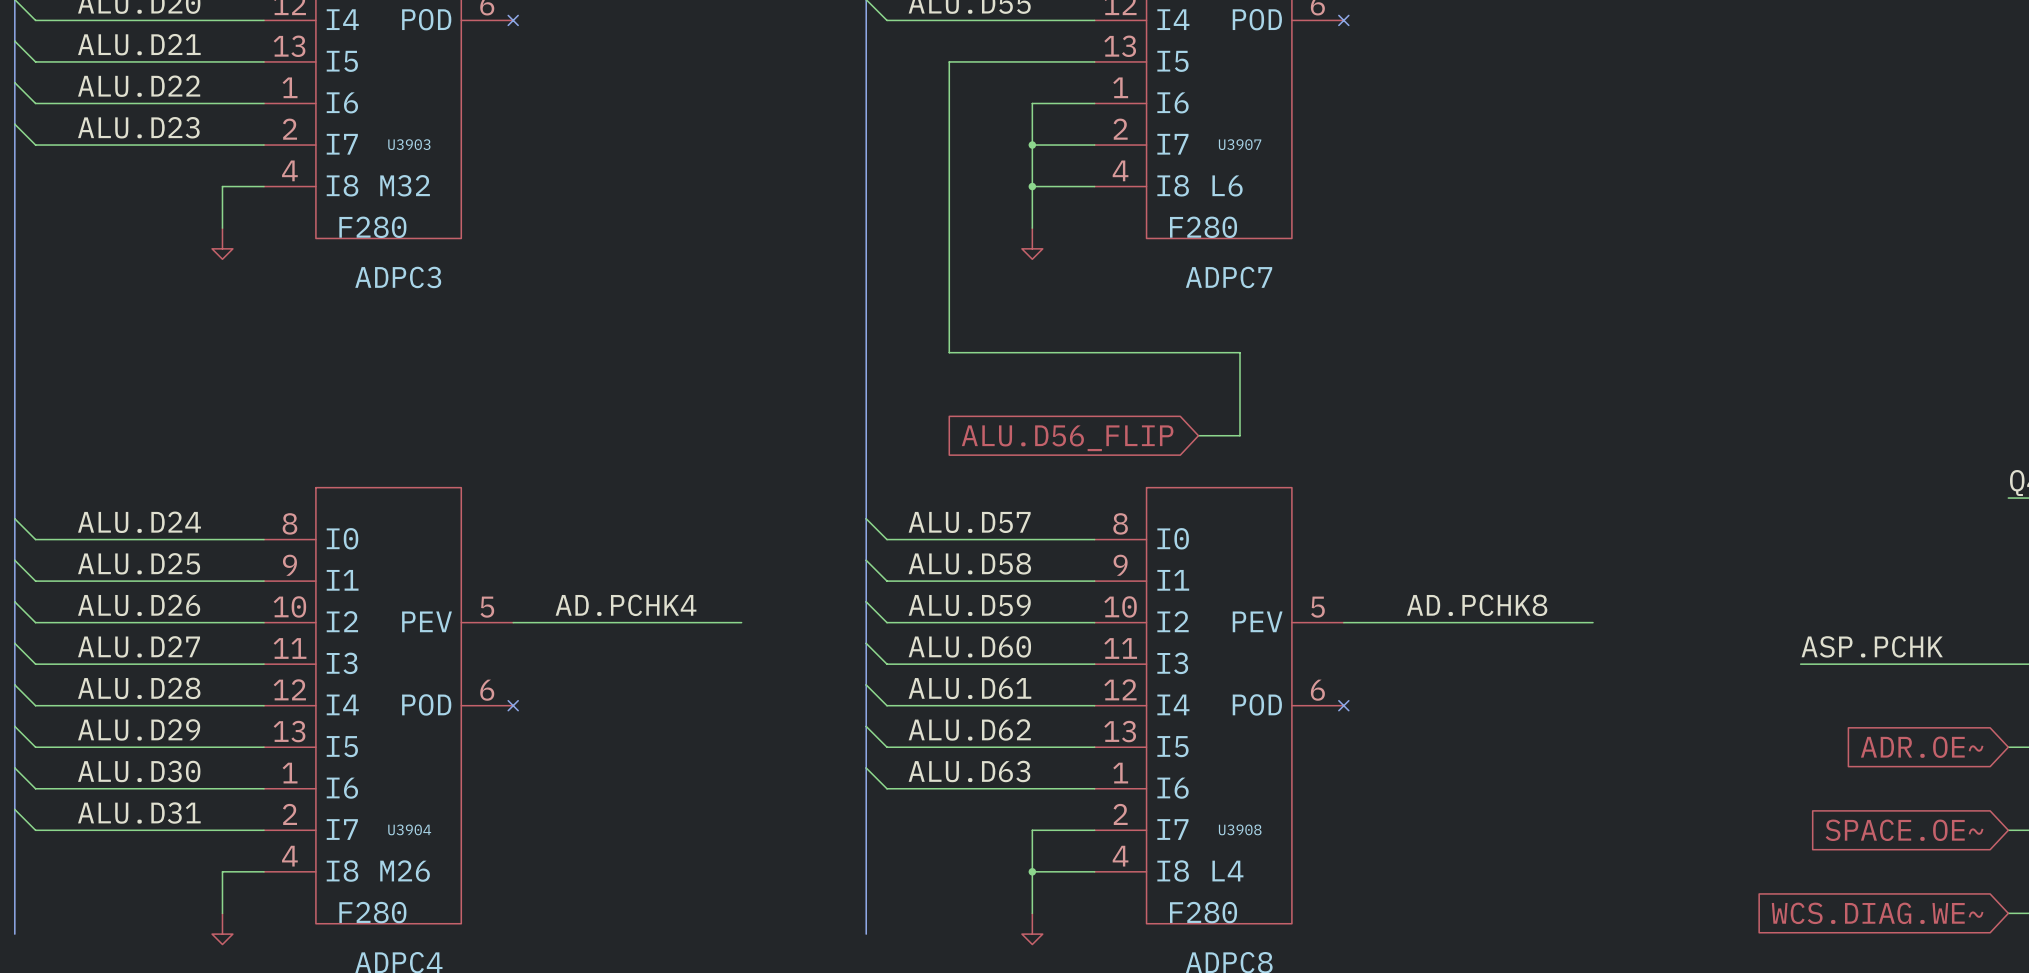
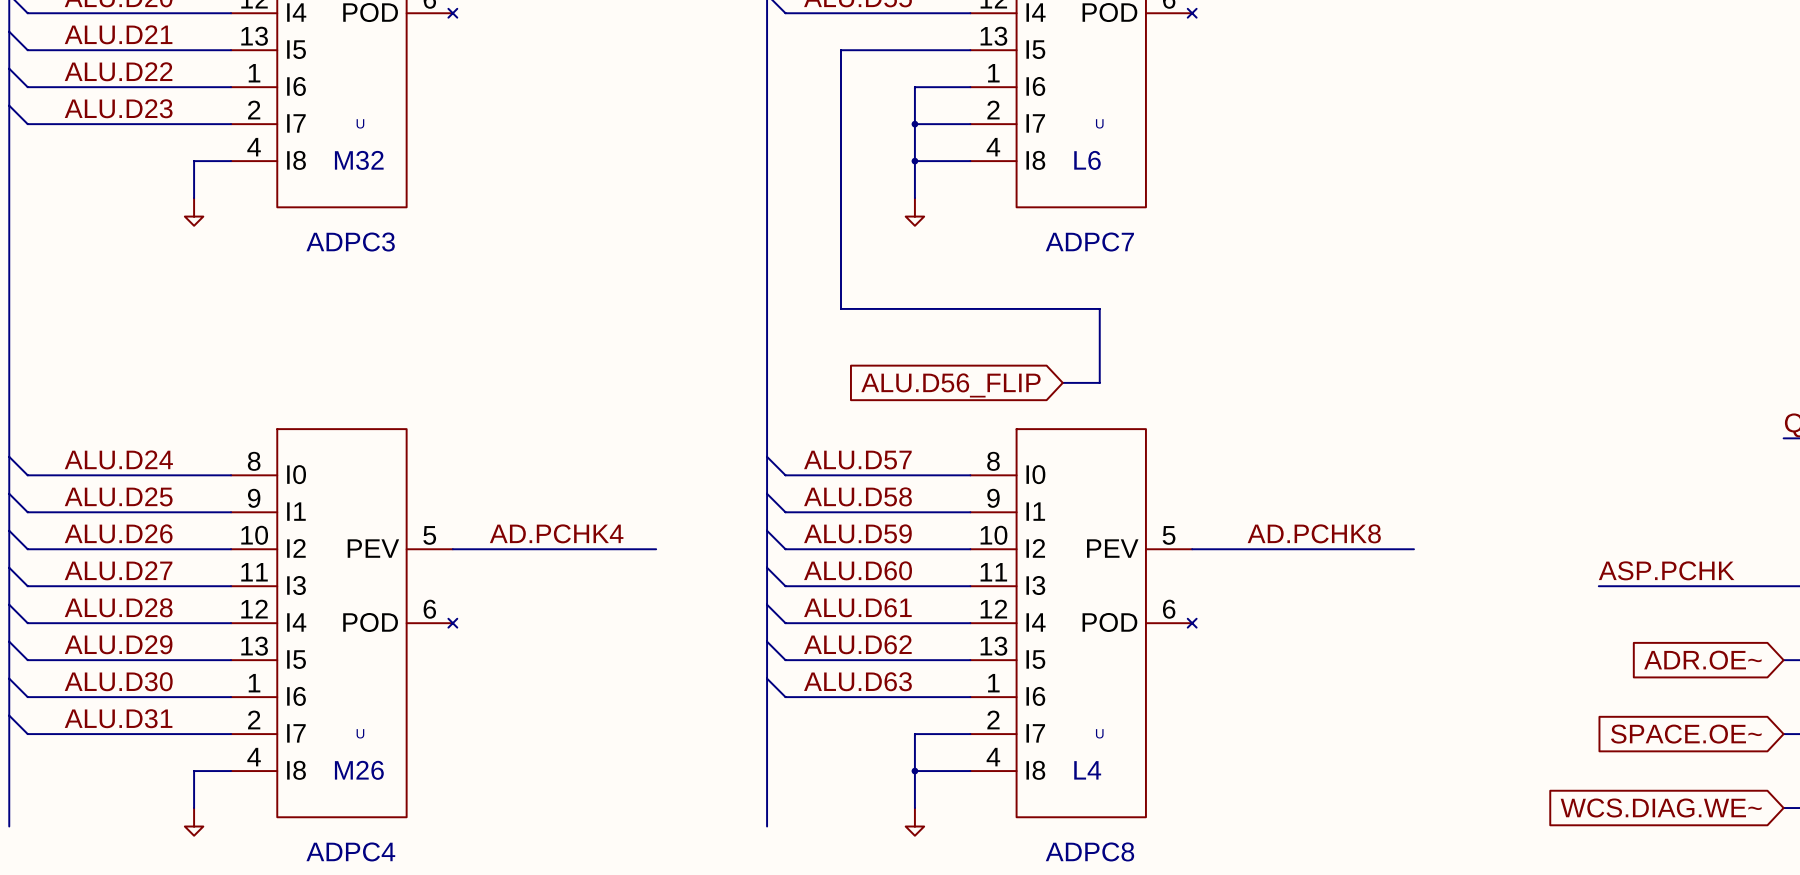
U3903 name: U3903 (409, 144) -> U (360, 123)
U3907 name: U3907 (1240, 144) -> U (1099, 123)
U3903 value: F280 (372, 227) -> none
U3907 value: F280 (1203, 227) -> none
U3904 name: U3904 (409, 829) -> U (360, 733)
U3908 name: U3908 (1240, 829) -> U (1099, 733)
U3904 value: F280 (372, 912) -> none
U3908 value: F280 (1203, 912) -> none

